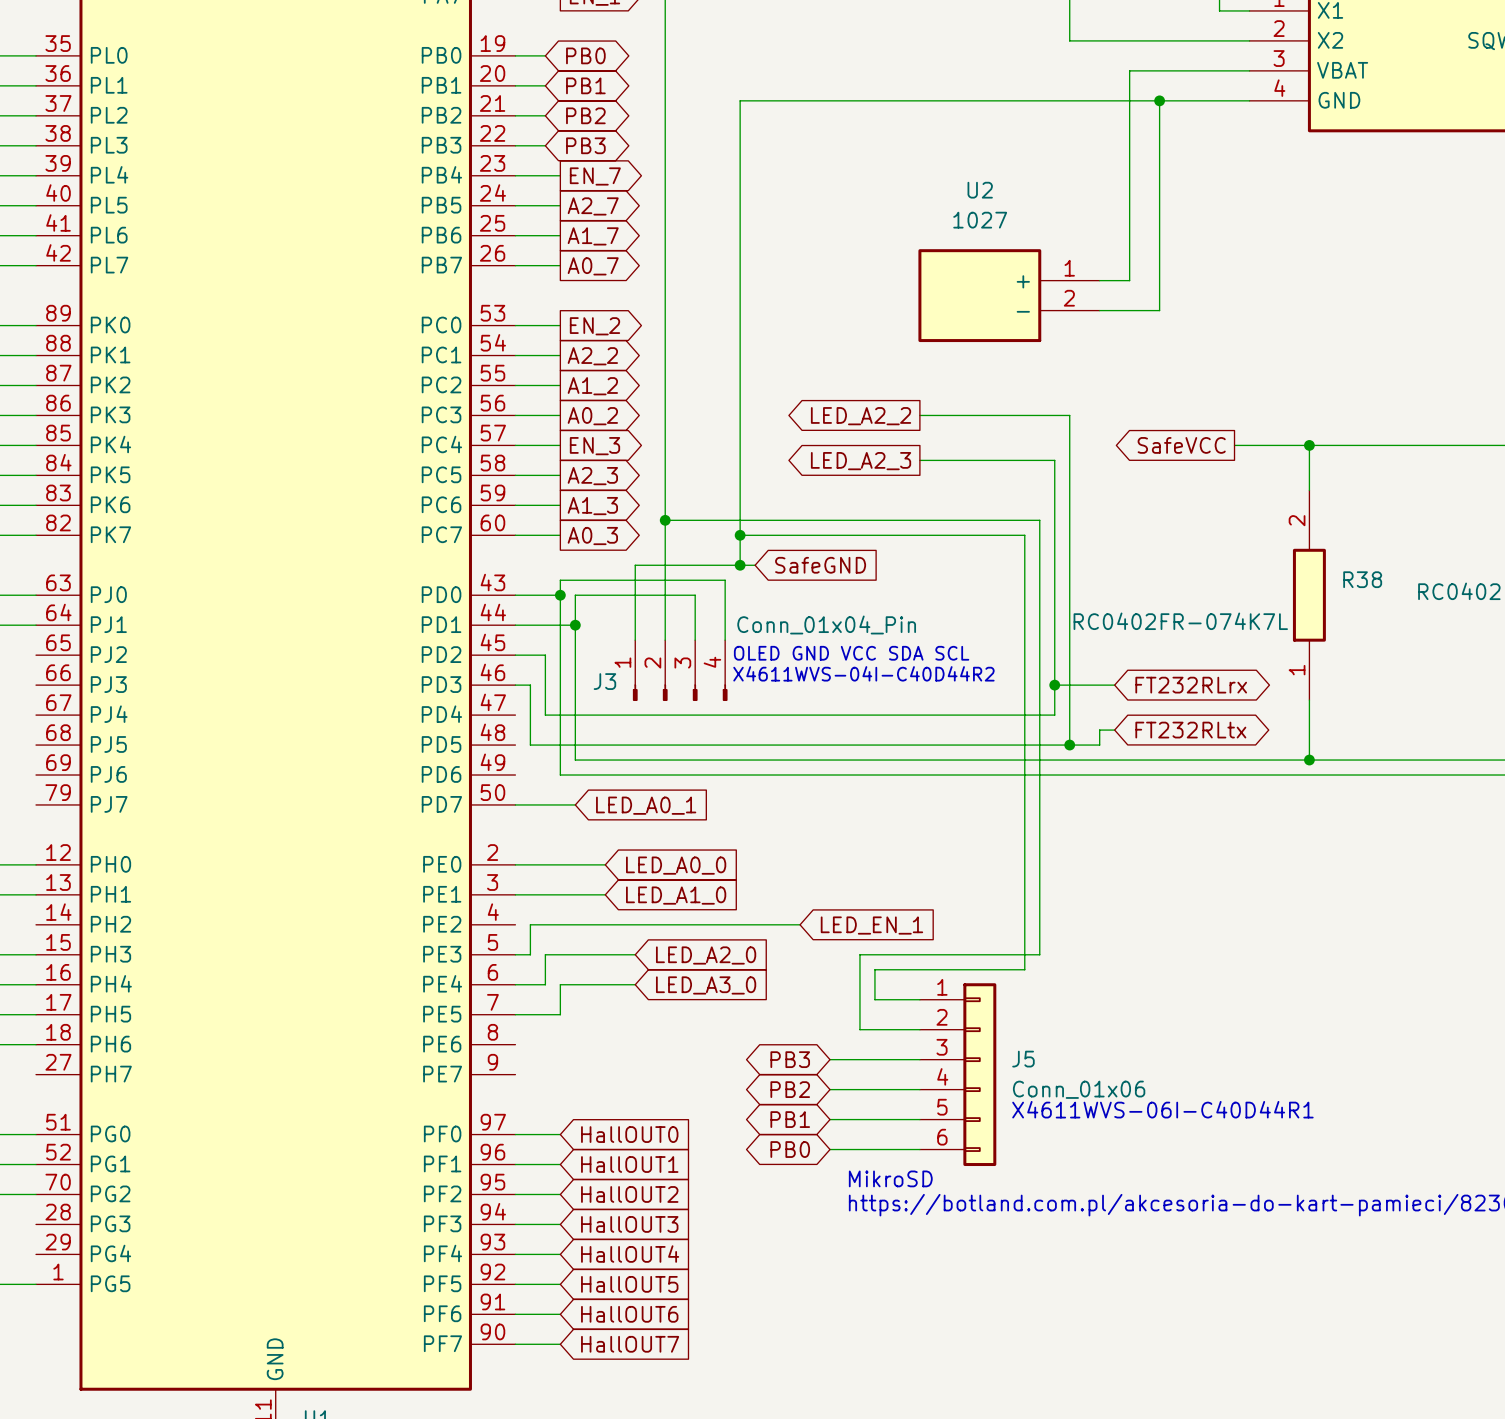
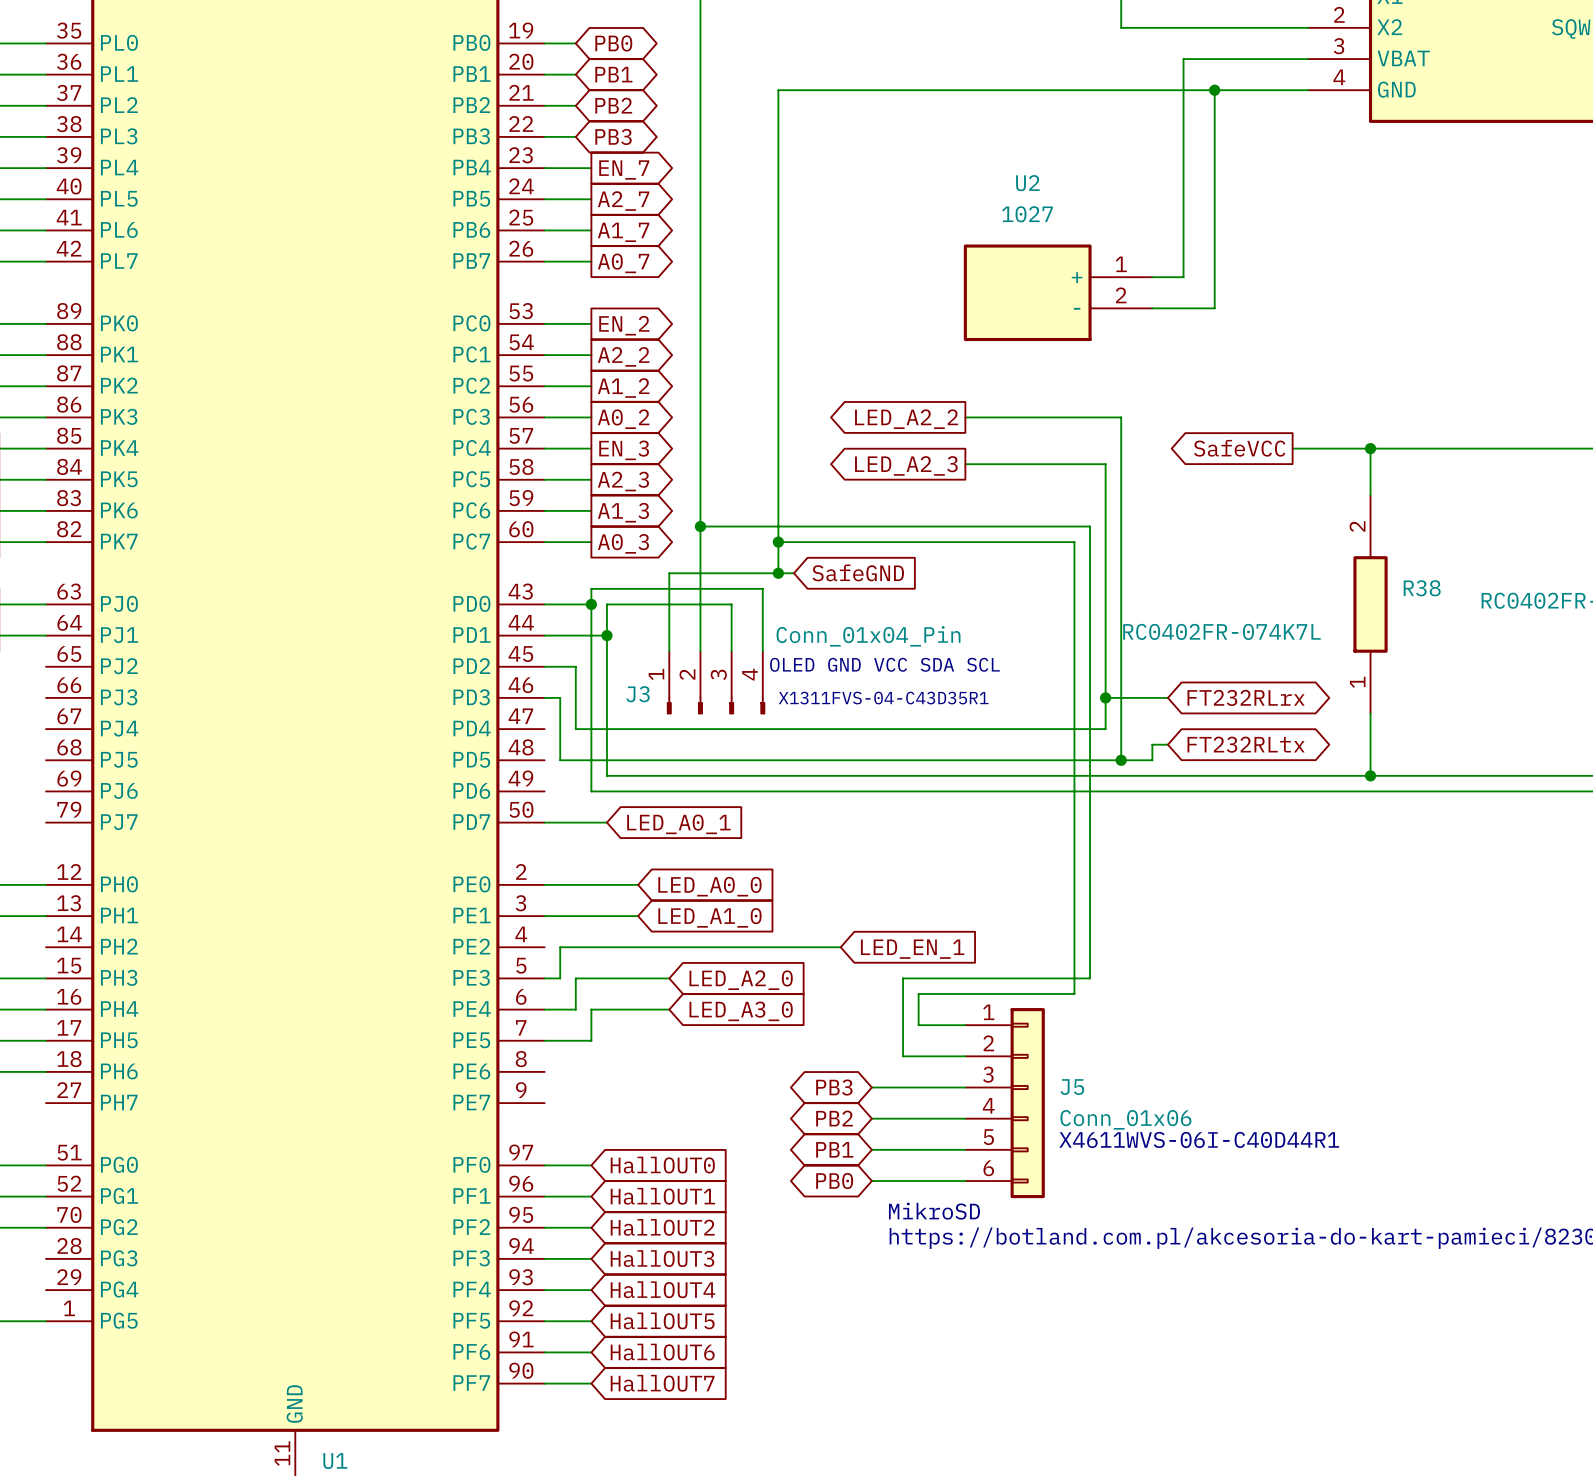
text: X4611WVS-04I-C40D44R2 (863, 673) -> X1311FVS-04-C43D35R1 (883, 698)

